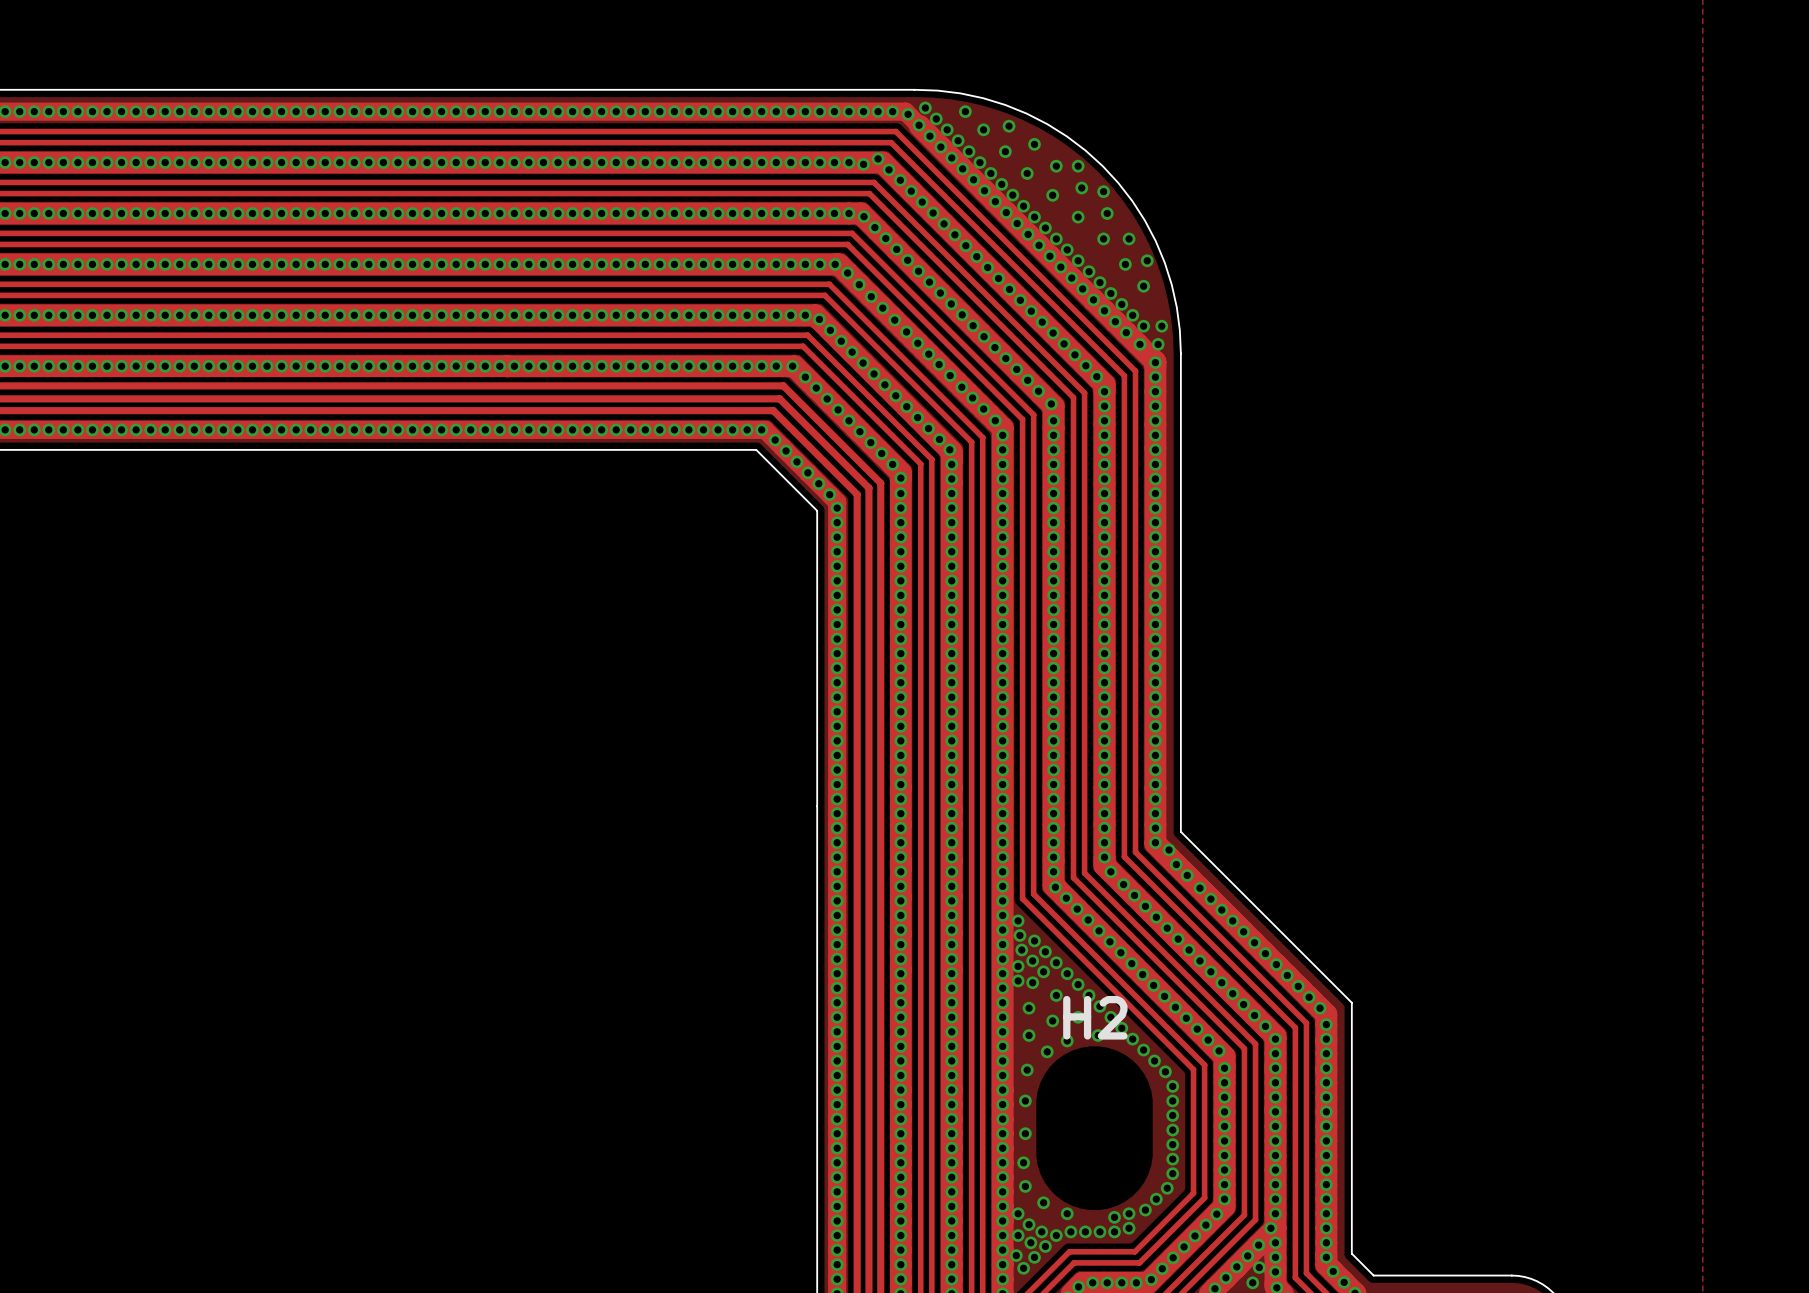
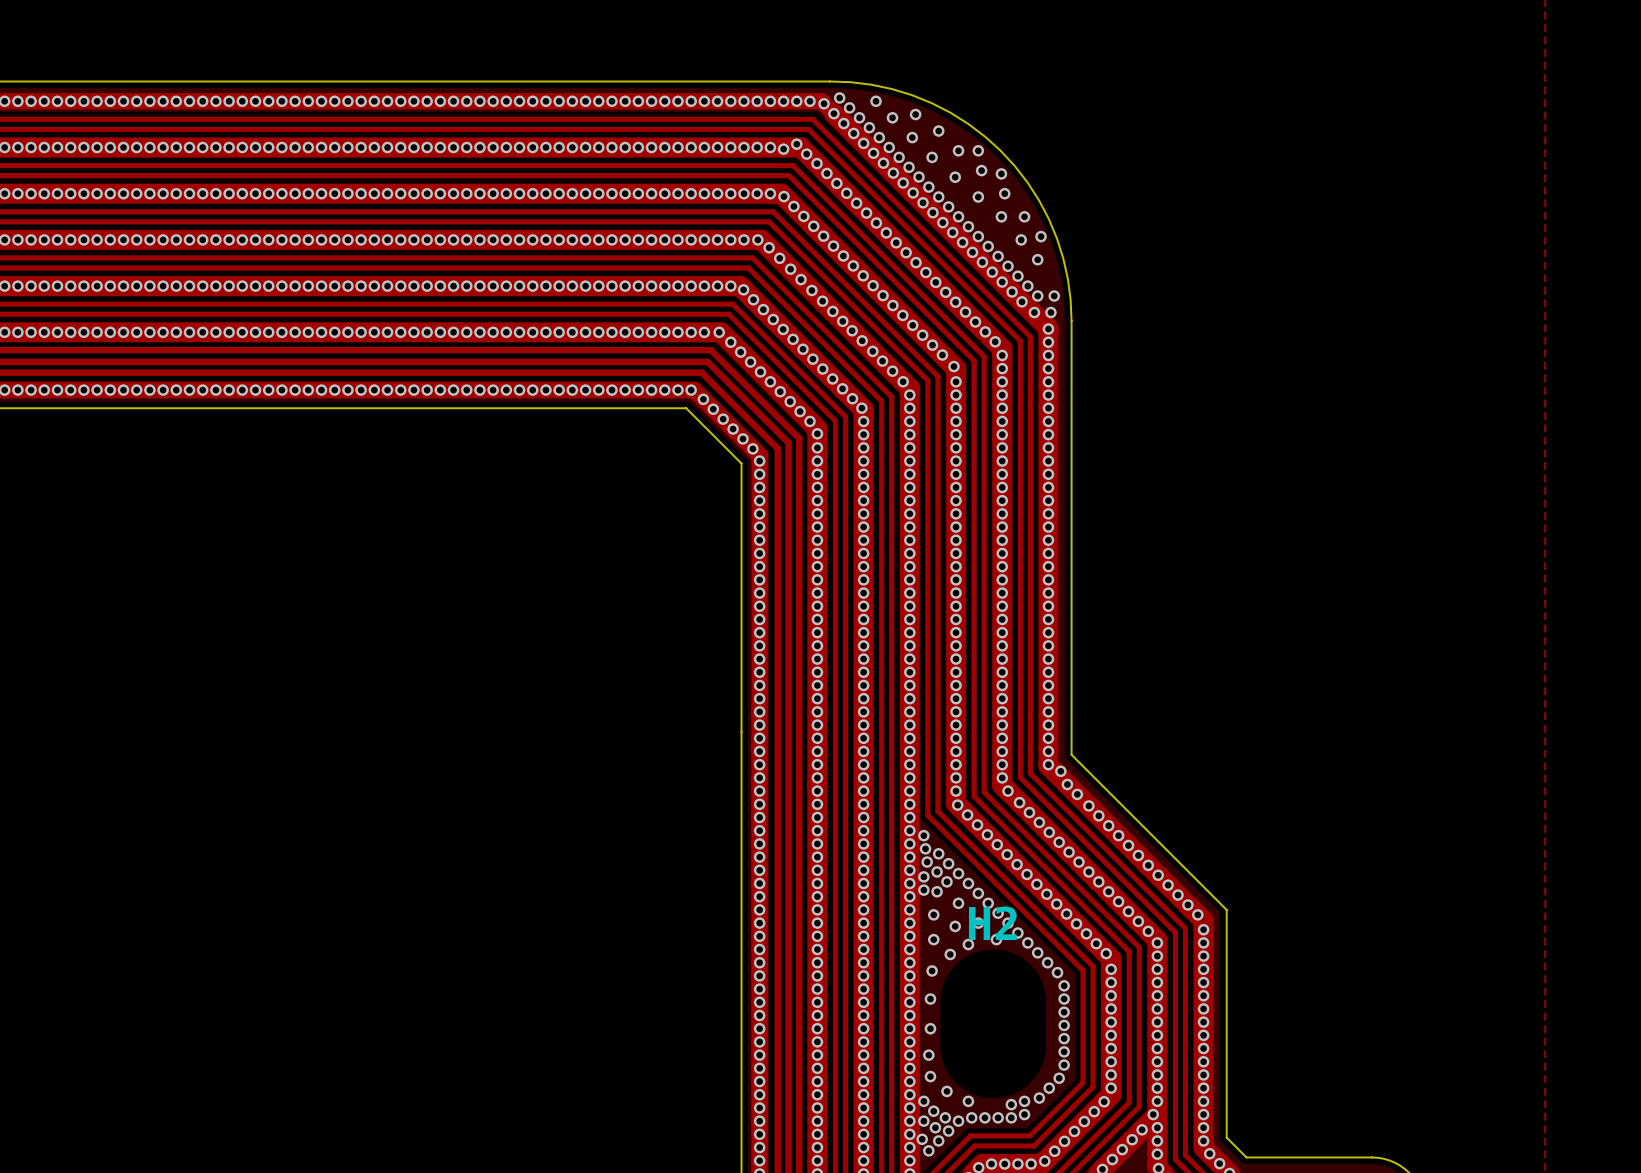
via: (1259, 1267) -> none
via: (1252, 1282) -> none

